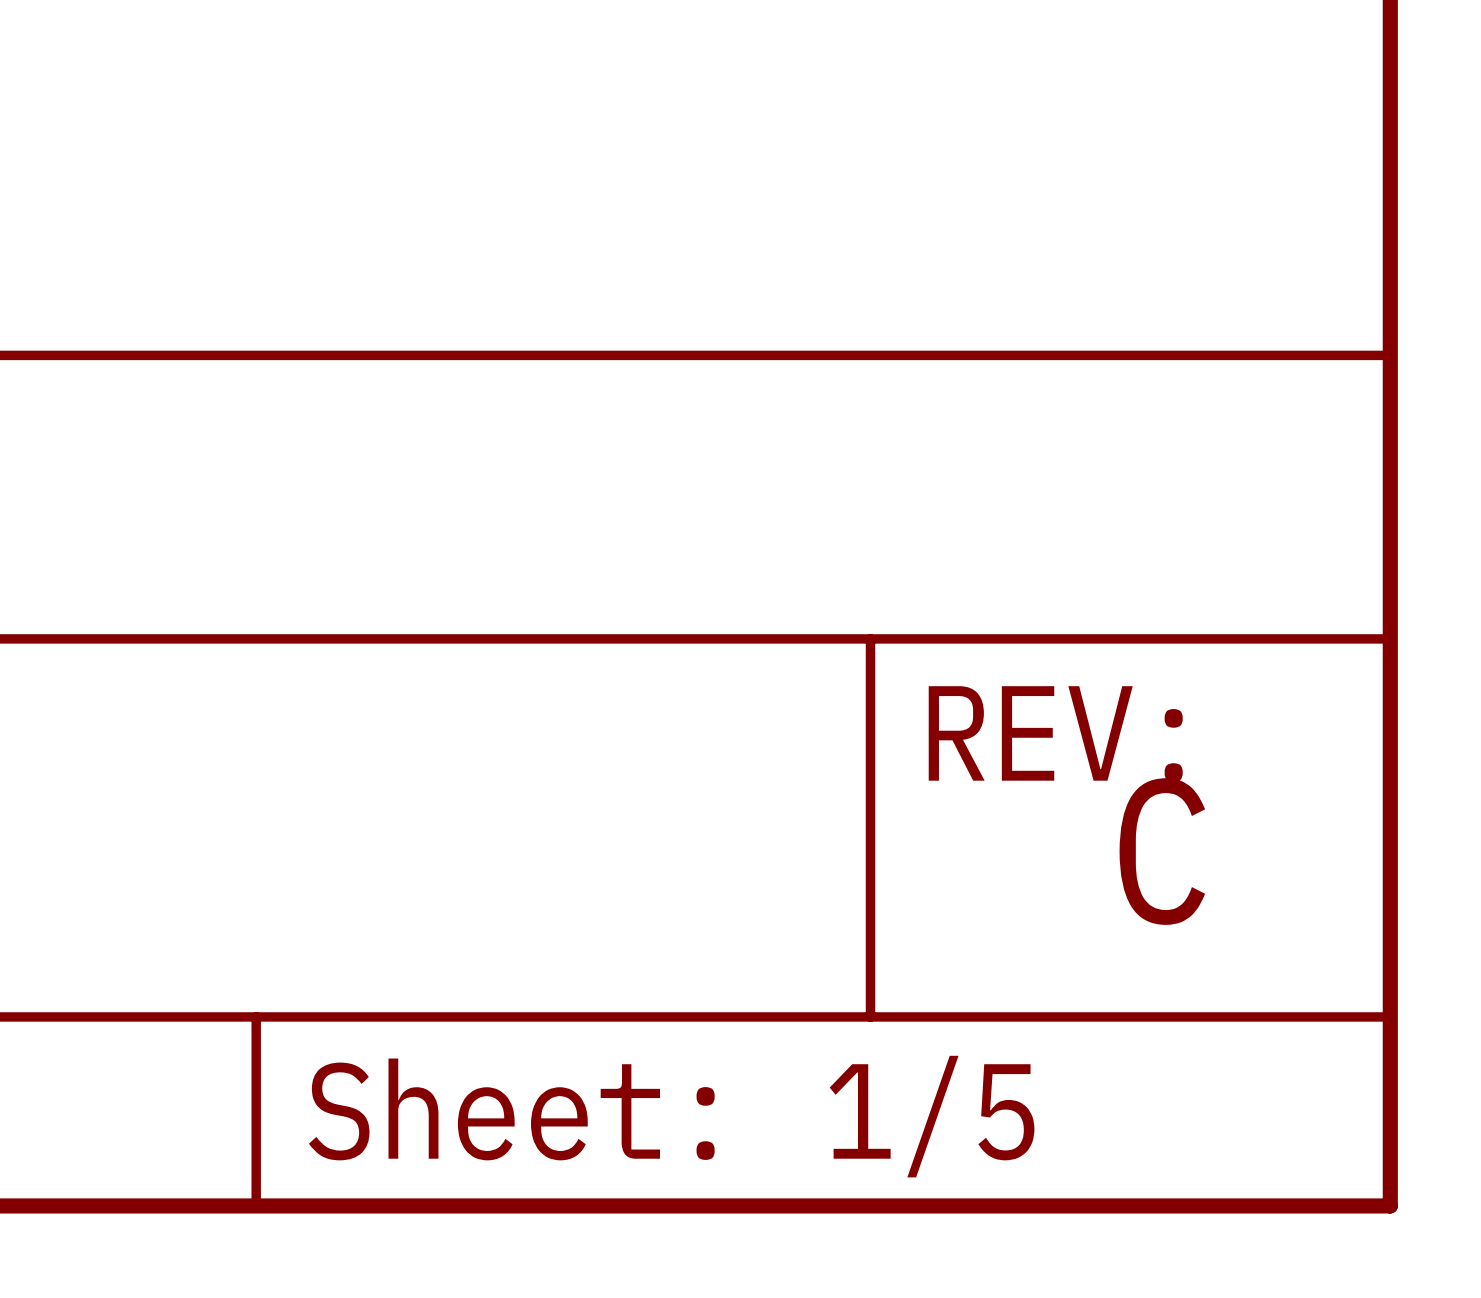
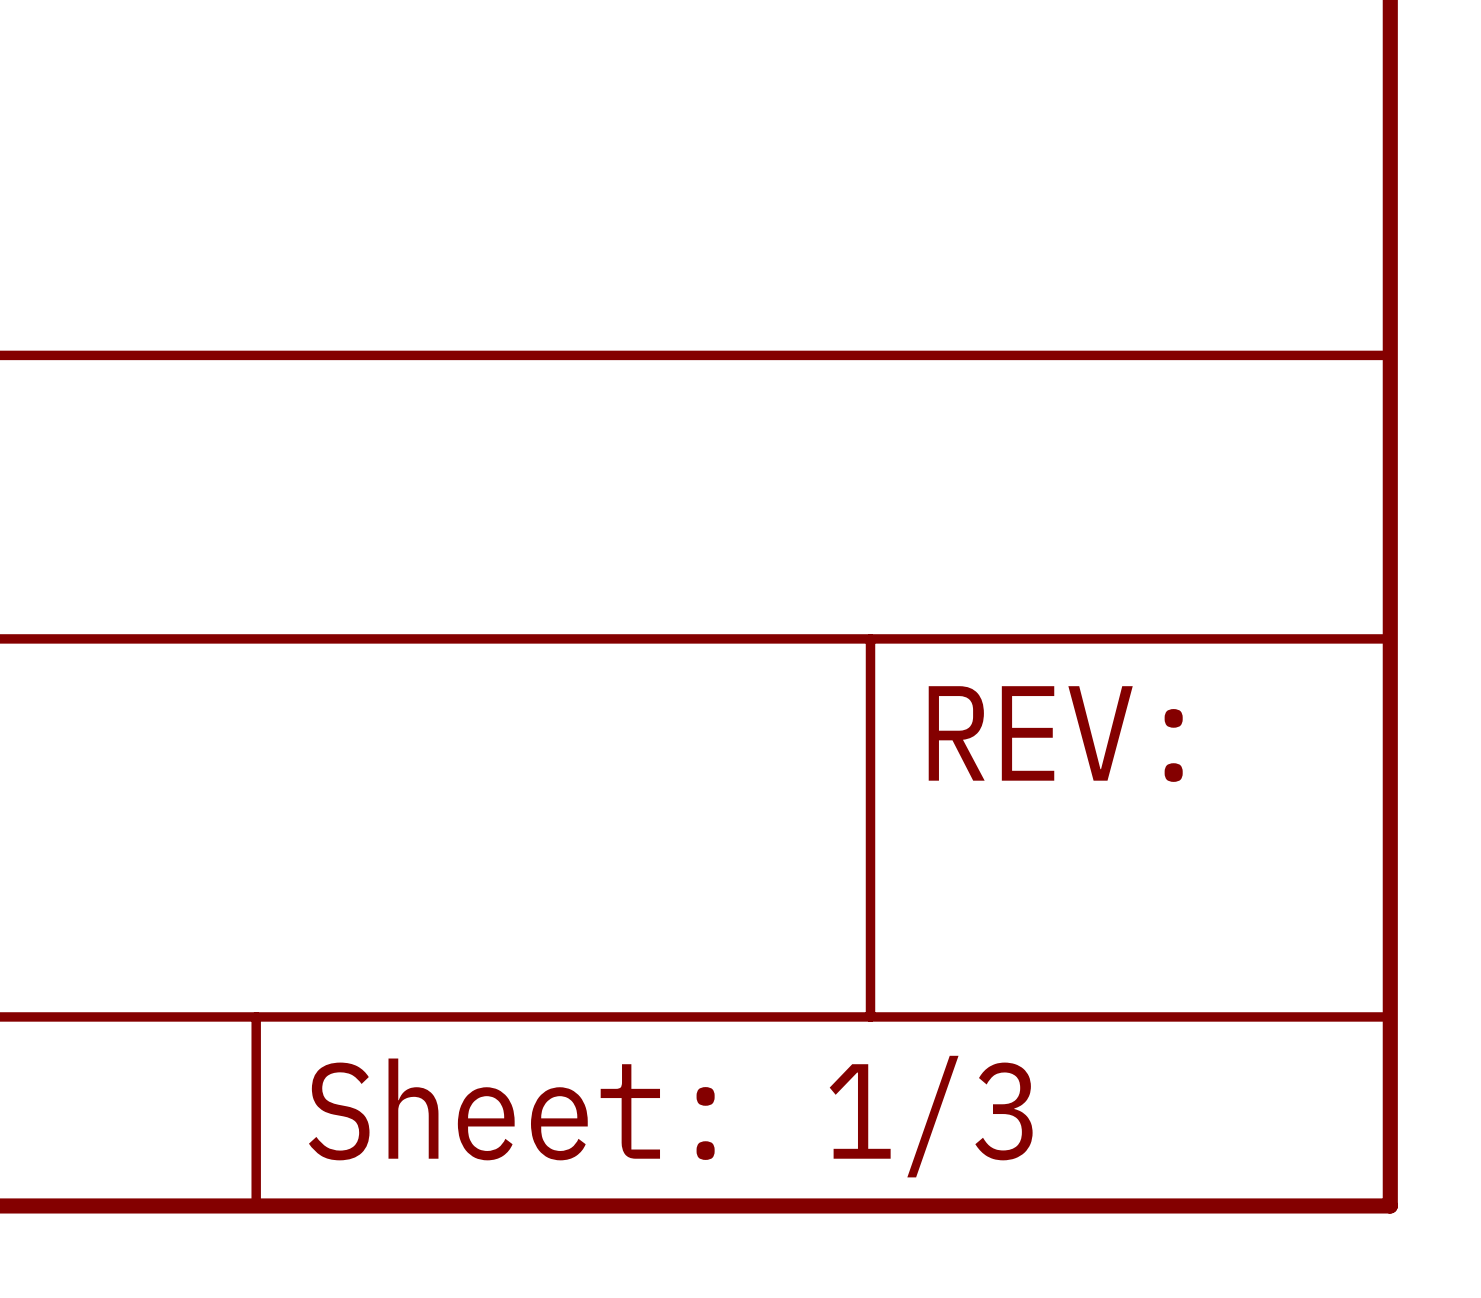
text: C (1162, 851) -> none
part text: 1/5 (932, 1116) -> 1/3 (931, 1116)

